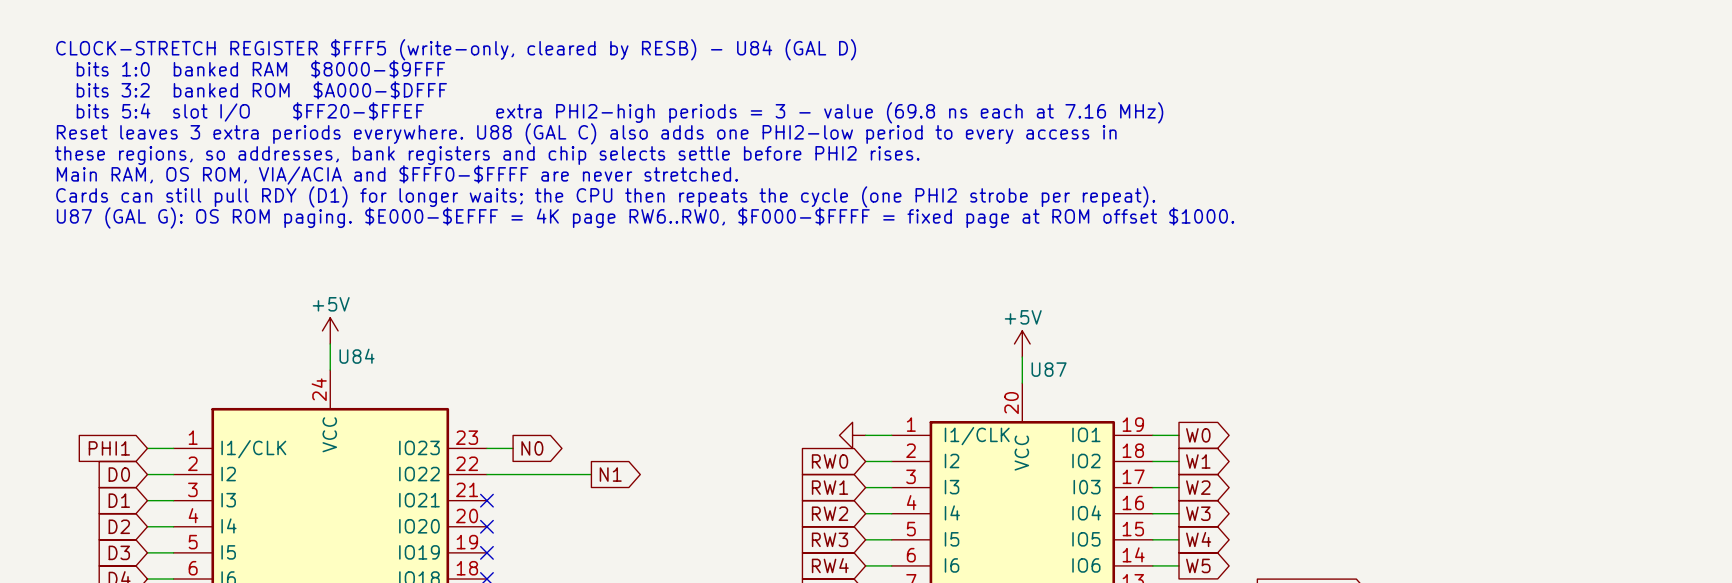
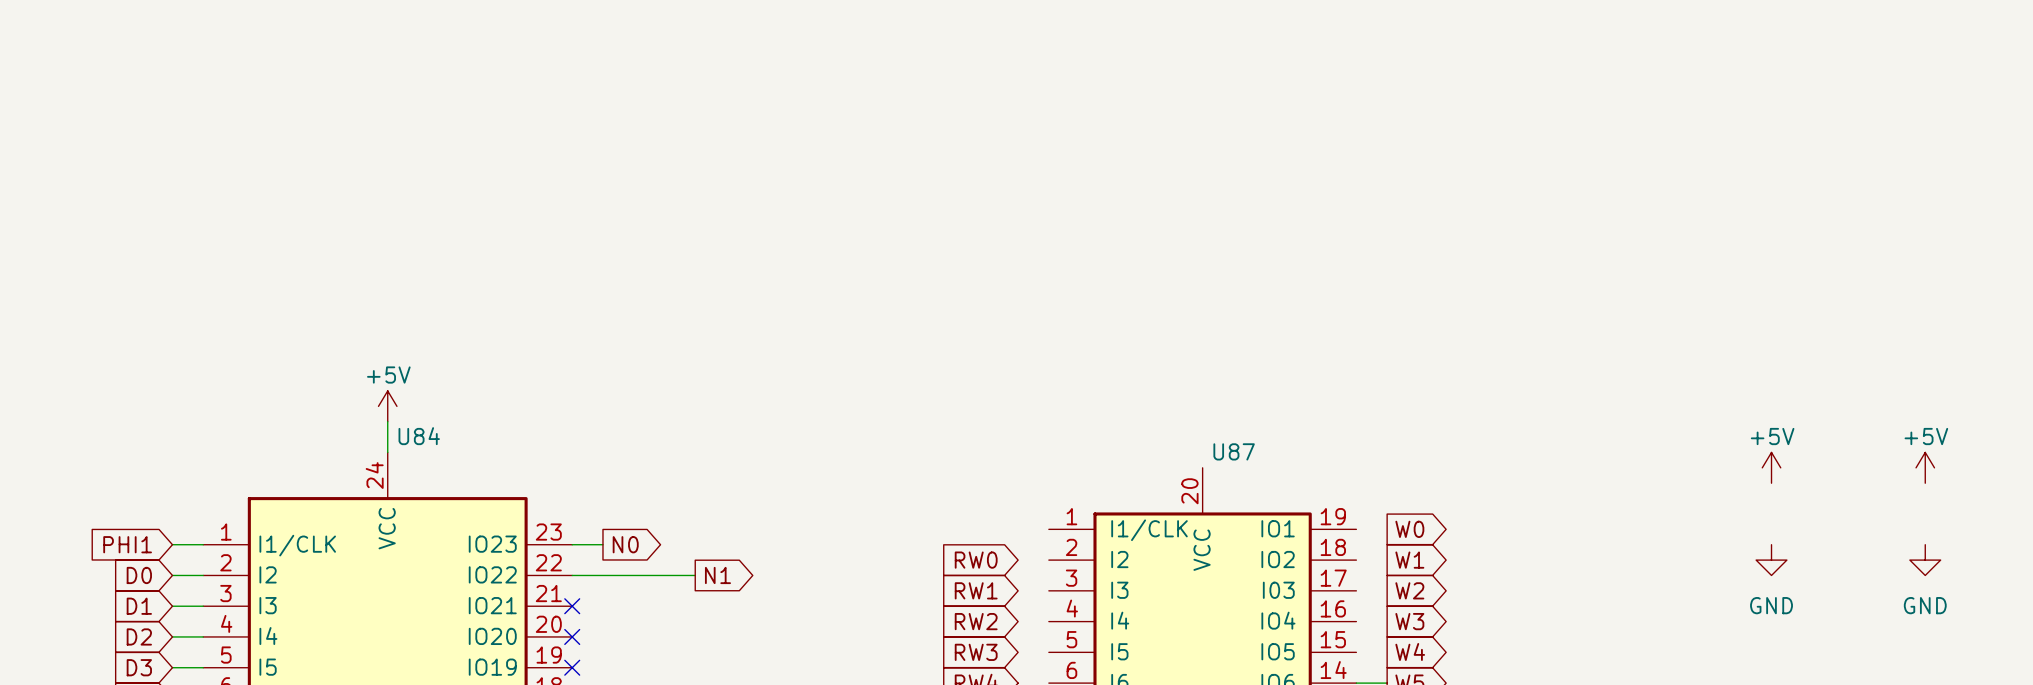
text: CLOCK-STRETCH REGISTER $FFF5 (write-only, cleared by RESB) - U84 (GAL D) (456, 49) -> none
text: bits 1:0 banked RAM $8000-$9FFF (260, 69) -> none
text: bits 3:2 banked ROM $A000-$DFFF (261, 90) -> none
text: bits 5:4 slot I/O $FF20-$FFEF extra PHI2-high periods = 3 - value (69.8 ns each at 7.16 MHz) (619, 112) -> none
text: Reset leaves 3 extra periods everywhere. U88 (GAL C) also adds one PHI2-low period to every access in (586, 133) -> none
text: these regions, so addresses, bank registers and chip selects settle before PHI2 rises. (487, 155) -> none
text: Main RAM, OS ROM, VIA/ACIA and $FFF0-$FFFF are never stretched. (397, 174) -> none
text: Cards can still pull RDY (D1) for longer waits; the CPU then repeats the cycle (one PHI2 strobe per repeat). (605, 196) -> none
text: U87 (GAL G): OS ROM paging. $E000-$EFFF = 4K page RW6..RW0, $F000-$FFFF = fixed page at ROM offset $1000. (645, 217) -> none
power symbol: +5V (1022, 343) -> none
wire: (1022, 357) (1022, 383) -> none
power symbol: none -> +5V (1771, 467)
power symbol: none -> +5V (1925, 467)
power symbol: (852, 435) -> none
wire: (865, 435) (891, 435) -> none
wire: (1152, 435) (1179, 435) -> none
wire: (865, 461) (891, 461) -> none
wire: (1152, 461) (1179, 461) -> none
power symbol: none -> GND (1771, 560)
power symbol: none -> GND (1925, 560)
wire: (865, 487) (891, 487) -> none
wire: (1152, 487) (1179, 487) -> none
wire: (865, 513) (891, 513) -> none
wire: (1152, 513) (1179, 513) -> none
wire: (865, 539) (891, 539) -> none
wire: (1152, 539) (1179, 539) -> none
wire: (865, 565) (891, 565) -> none

